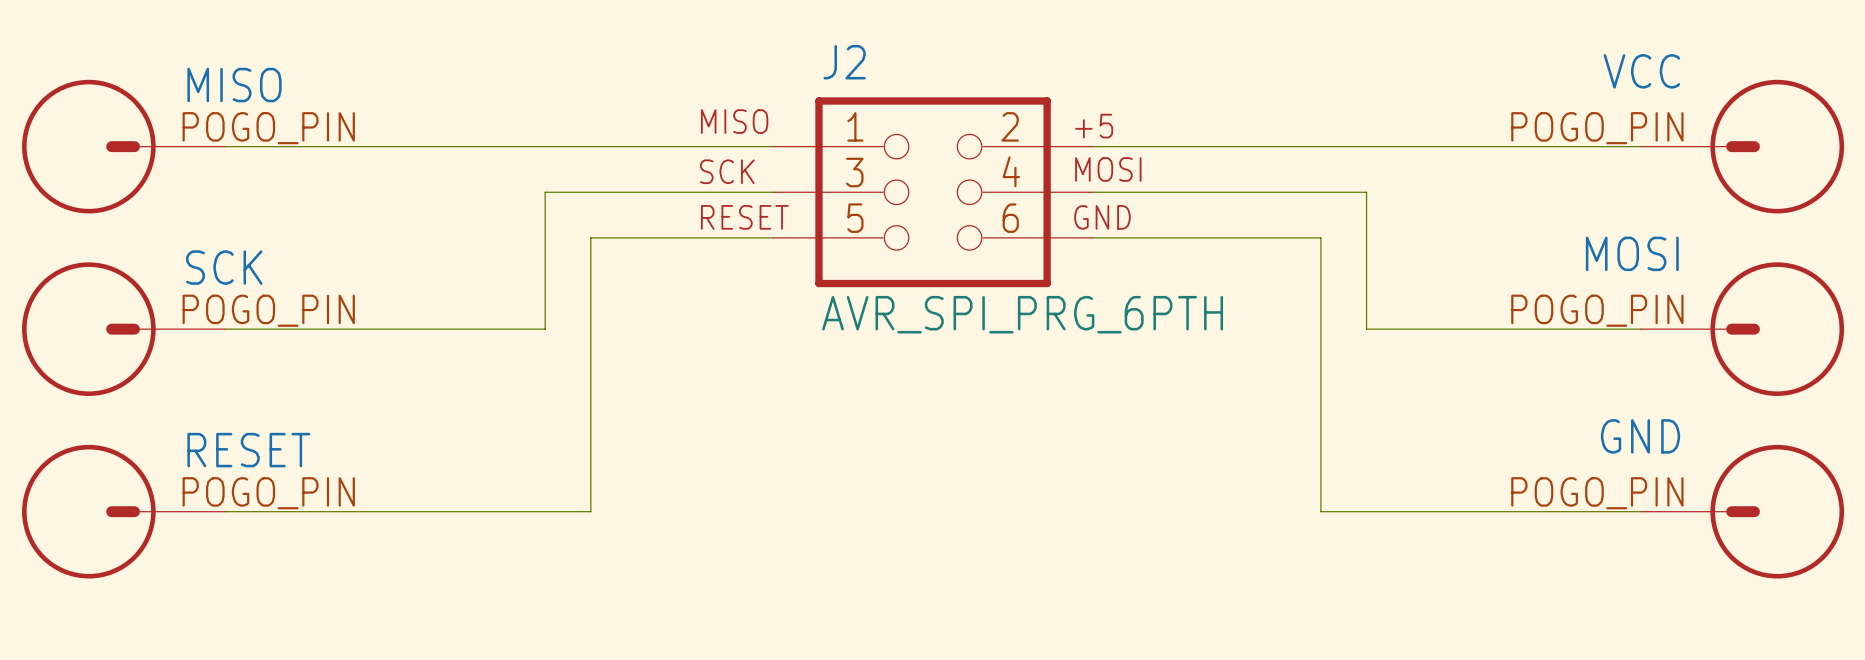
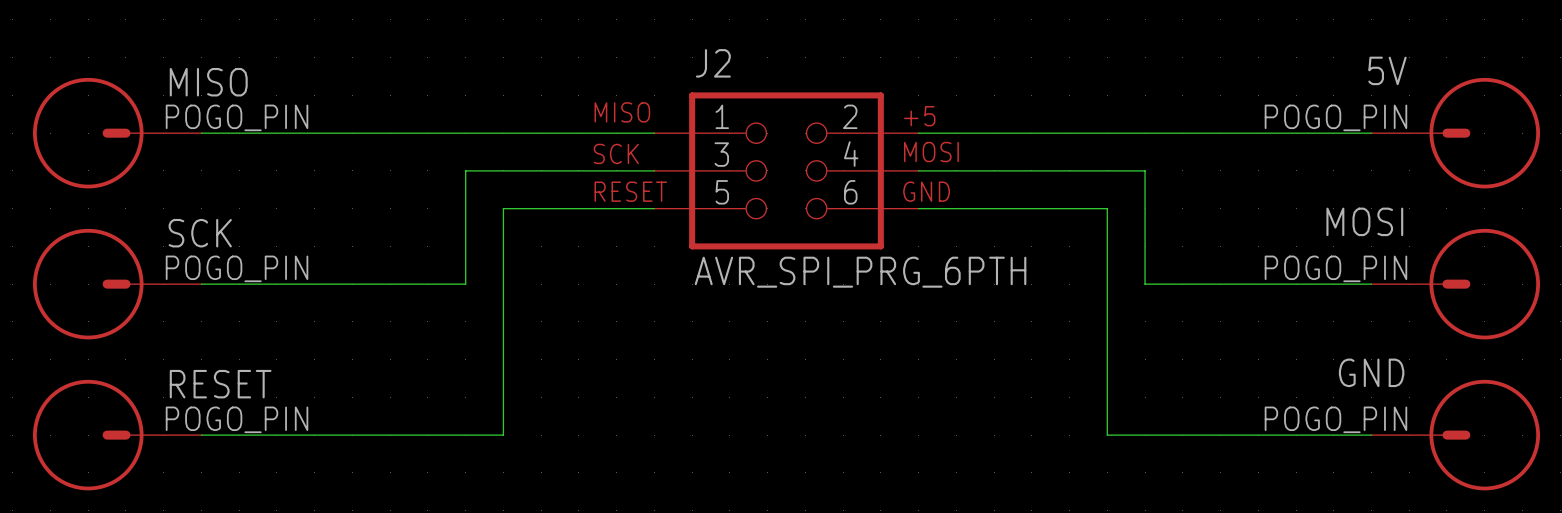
VCC name: VCC (1641, 71) -> 5V (1387, 70)

